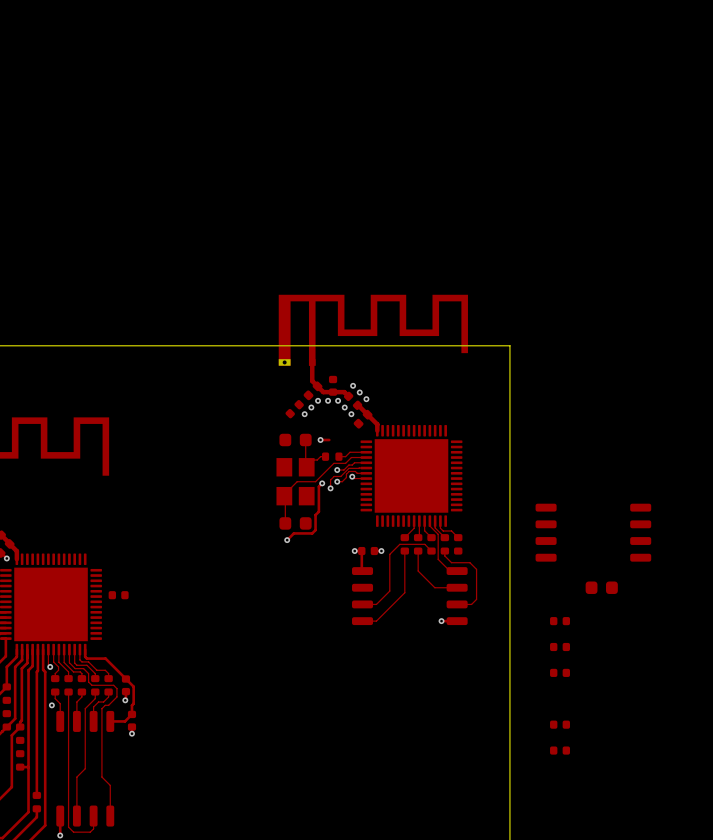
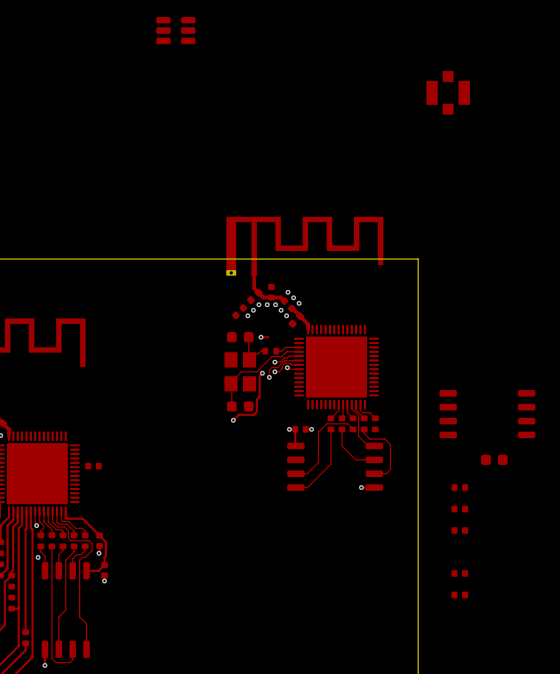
part: none -> (175, 30)
part: none -> (448, 92)

